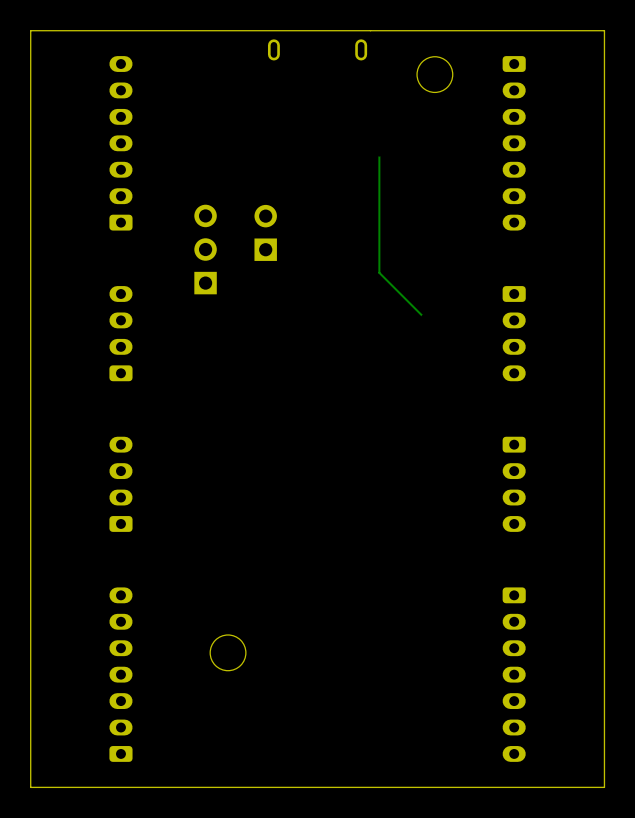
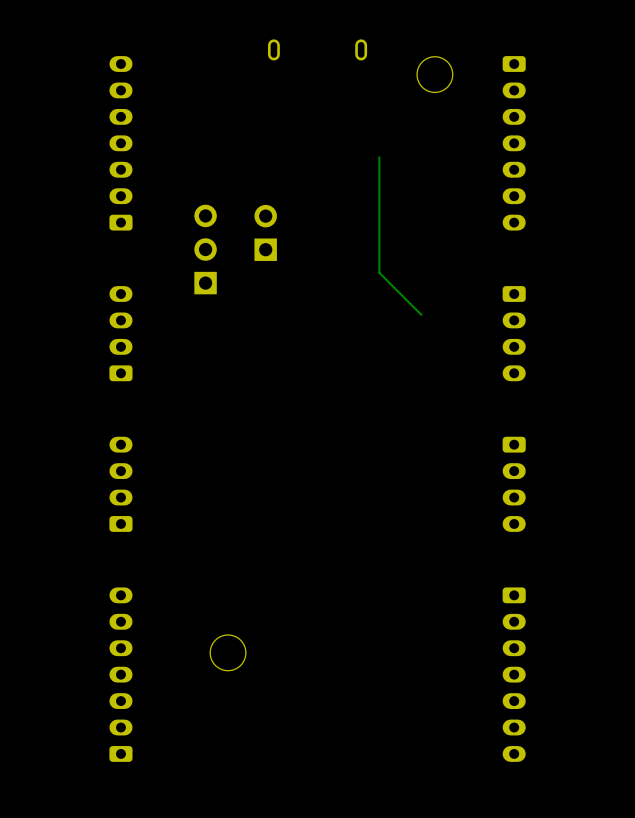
board edge: (604, 30) (30, 30) (30, 787) (604, 787) (604, 30) -> none

